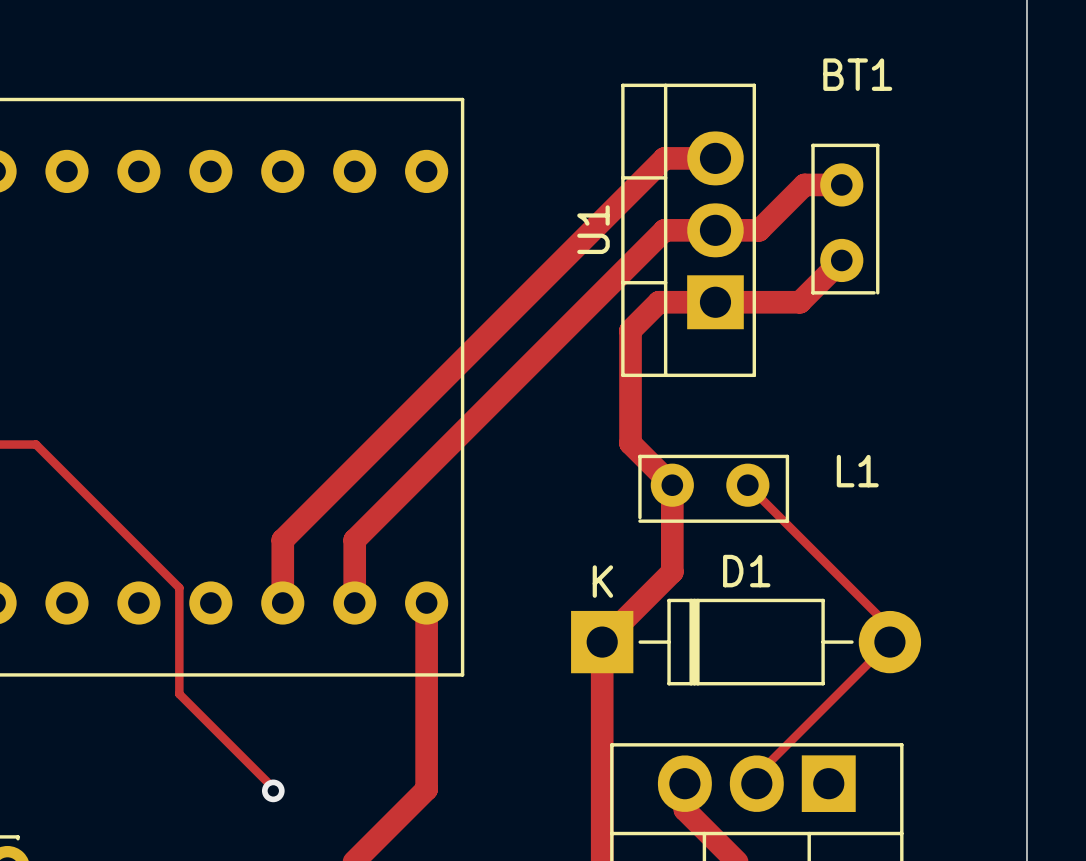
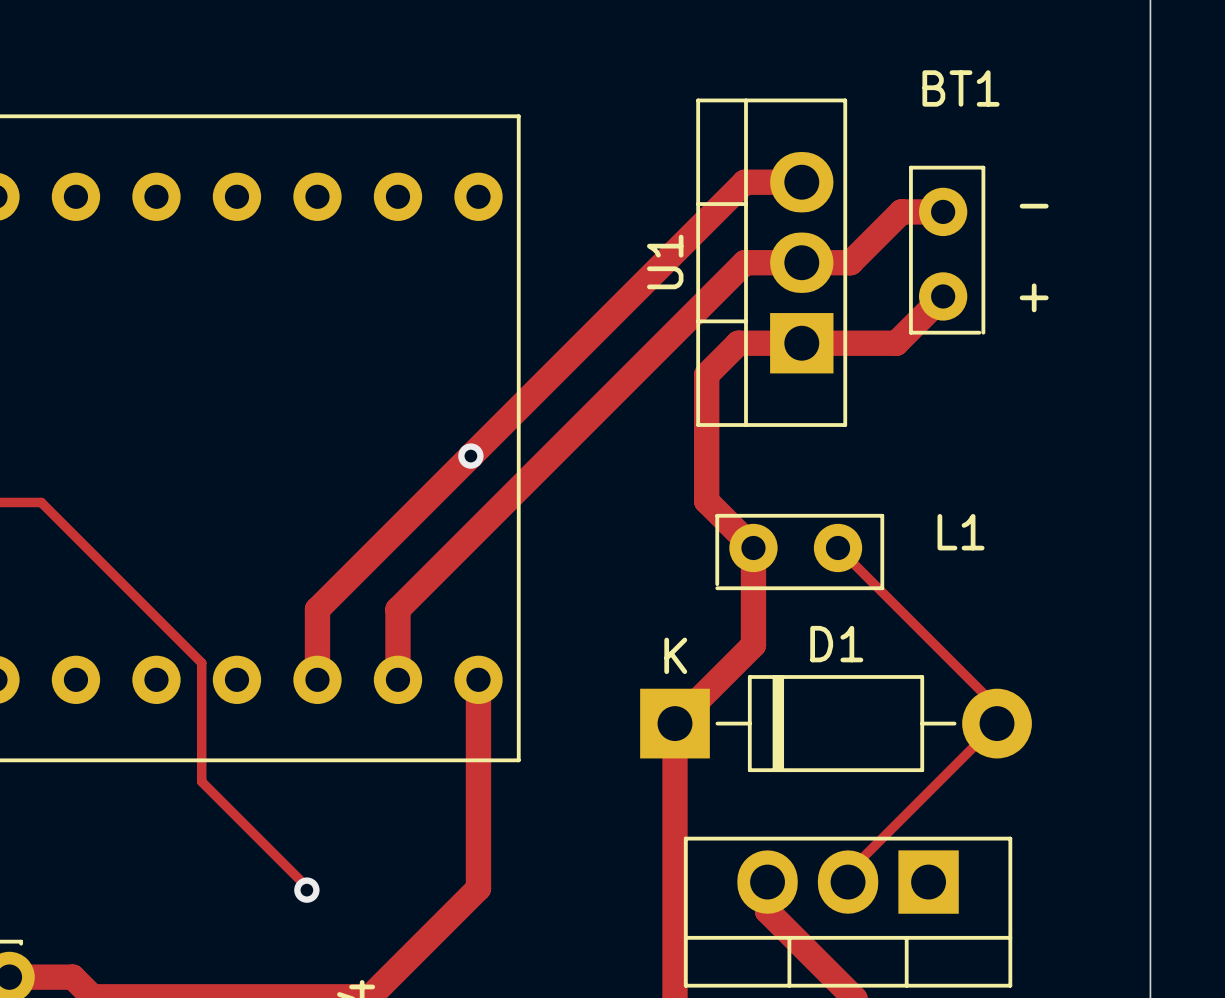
text: none -> - (1034, 206)
text: none -> + (1034, 297)
via: none -> (470, 456)

